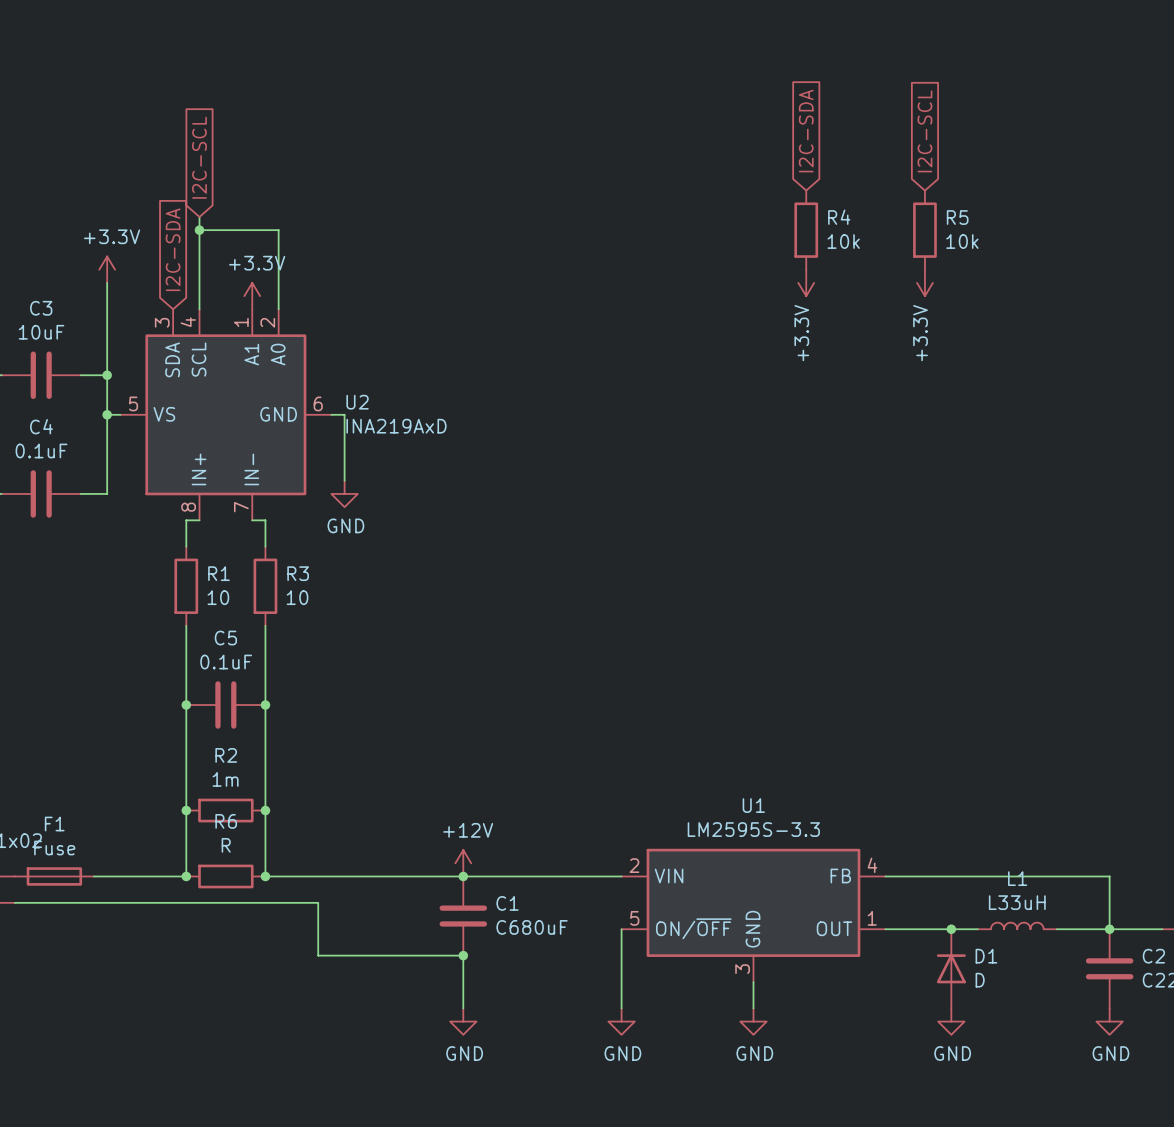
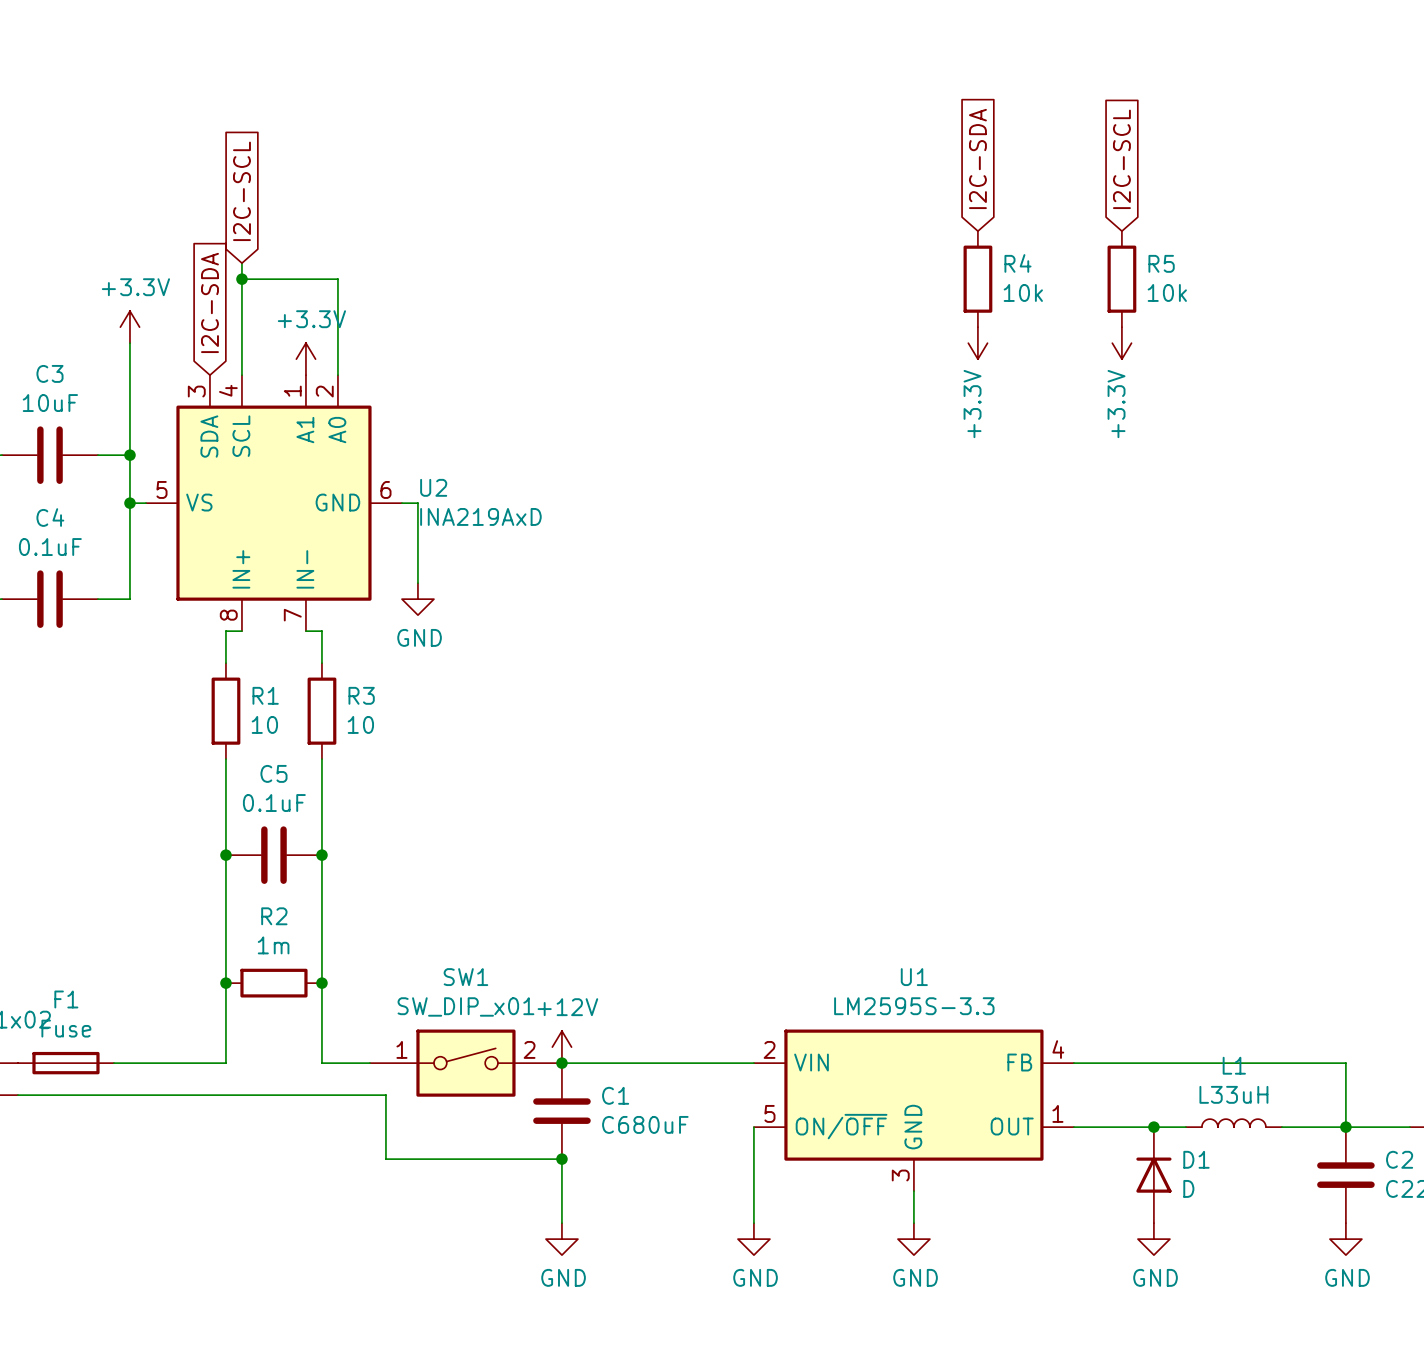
junction: (186, 876) -> none
R6: R (225, 876) -> none
junction: (265, 876) -> none
SW1: none -> SW_DIP_x01 (465, 1063)

